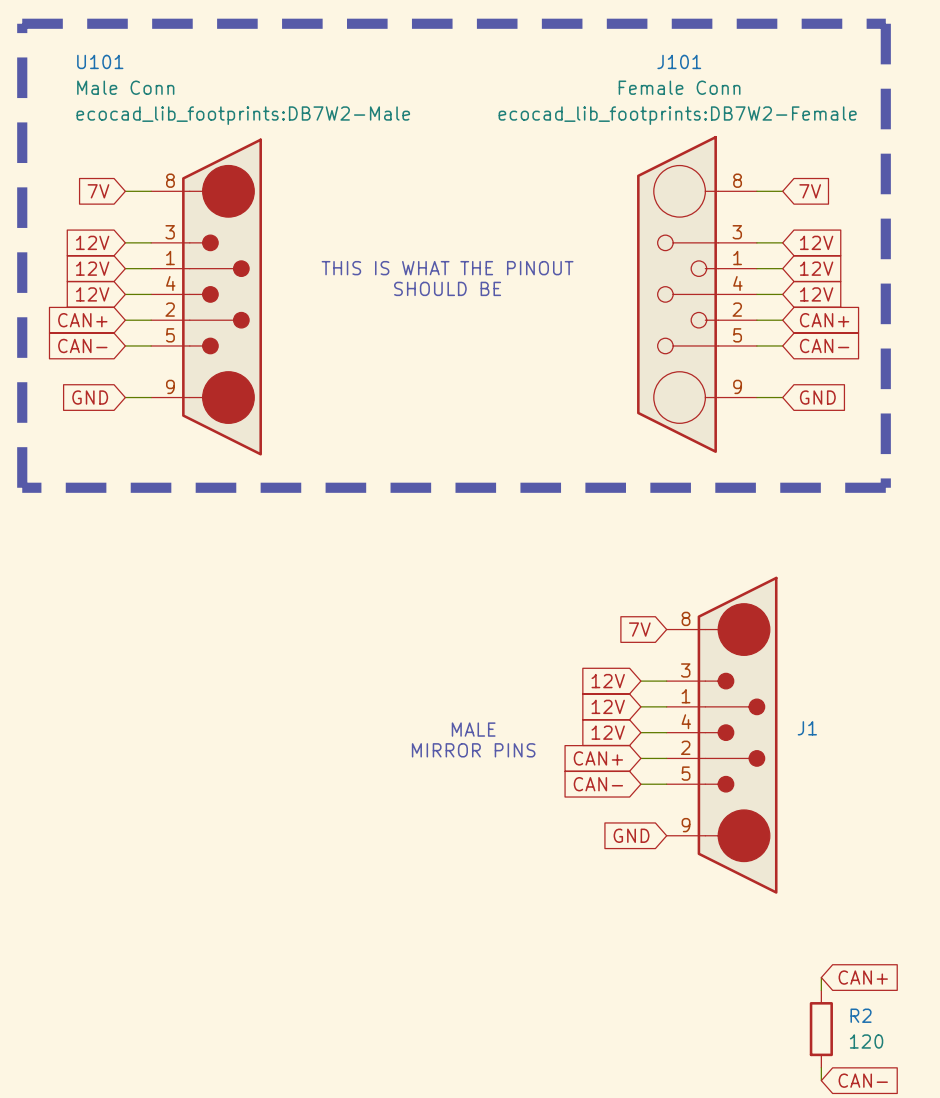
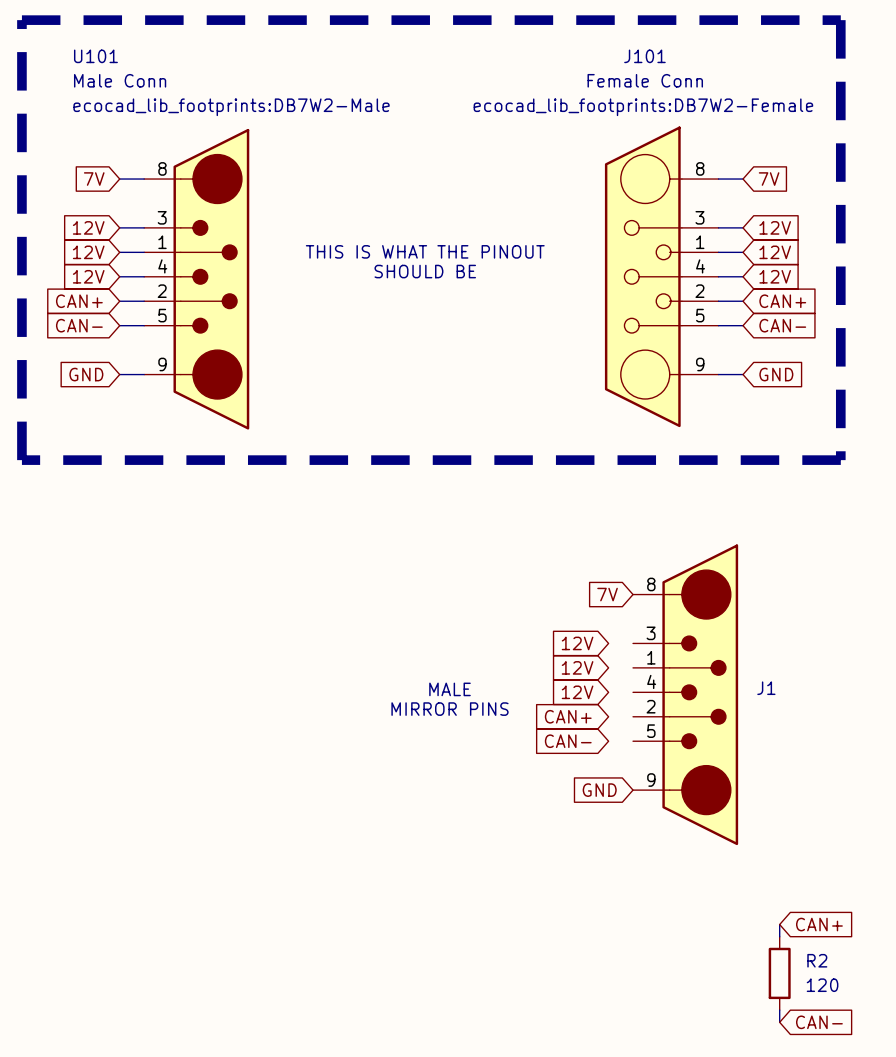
wire: (640, 681) (666, 681) -> none
wire: (640, 706) (666, 706) -> none
wire: (640, 732) (666, 732) -> none
wire: (640, 758) (666, 758) -> none
wire: (640, 784) (666, 784) -> none

